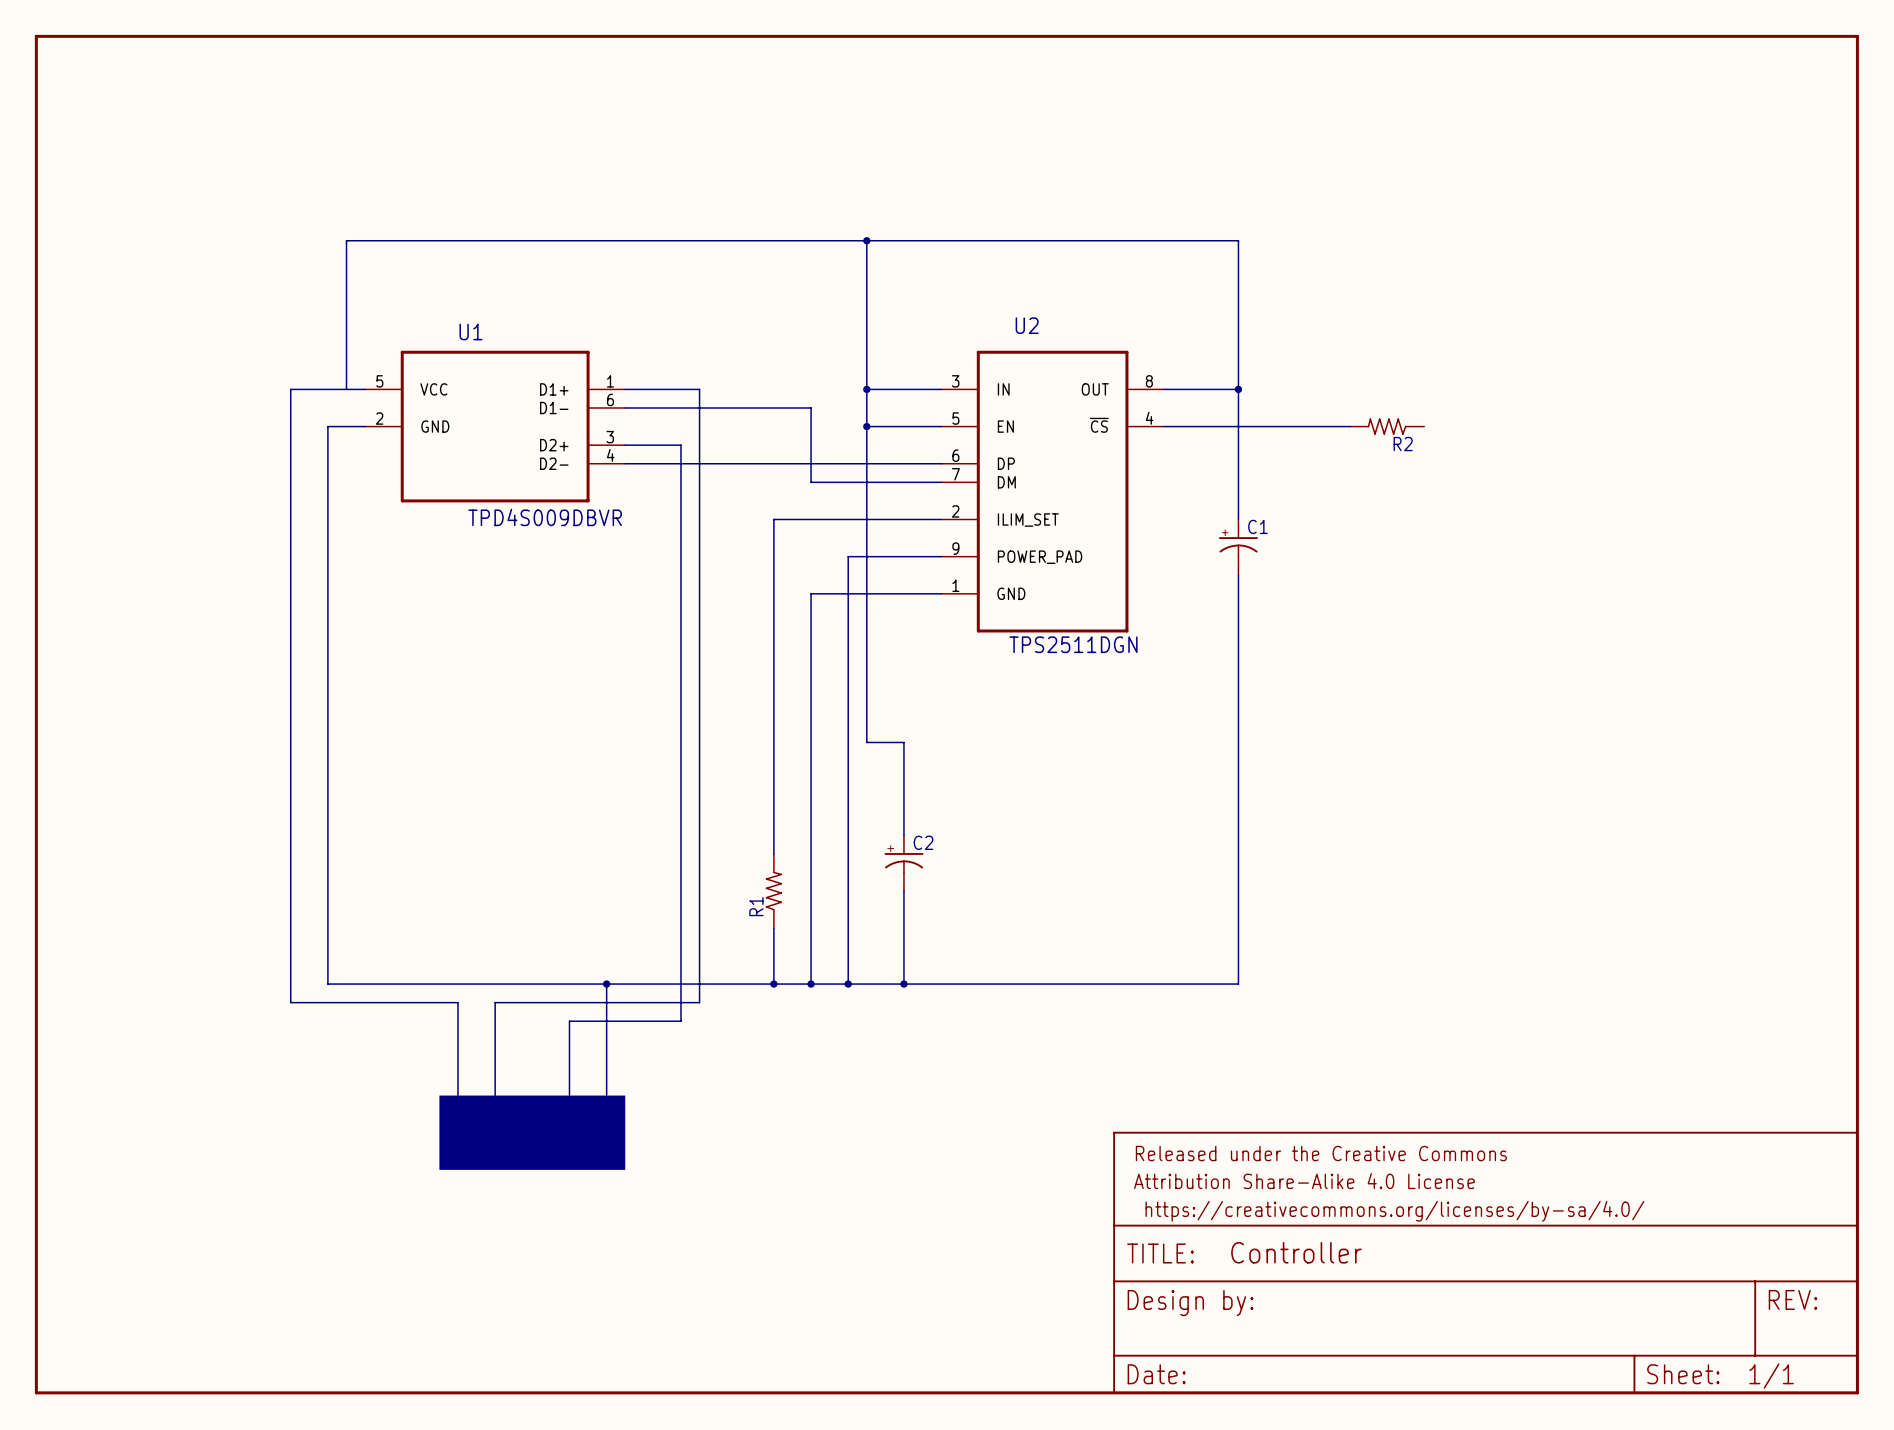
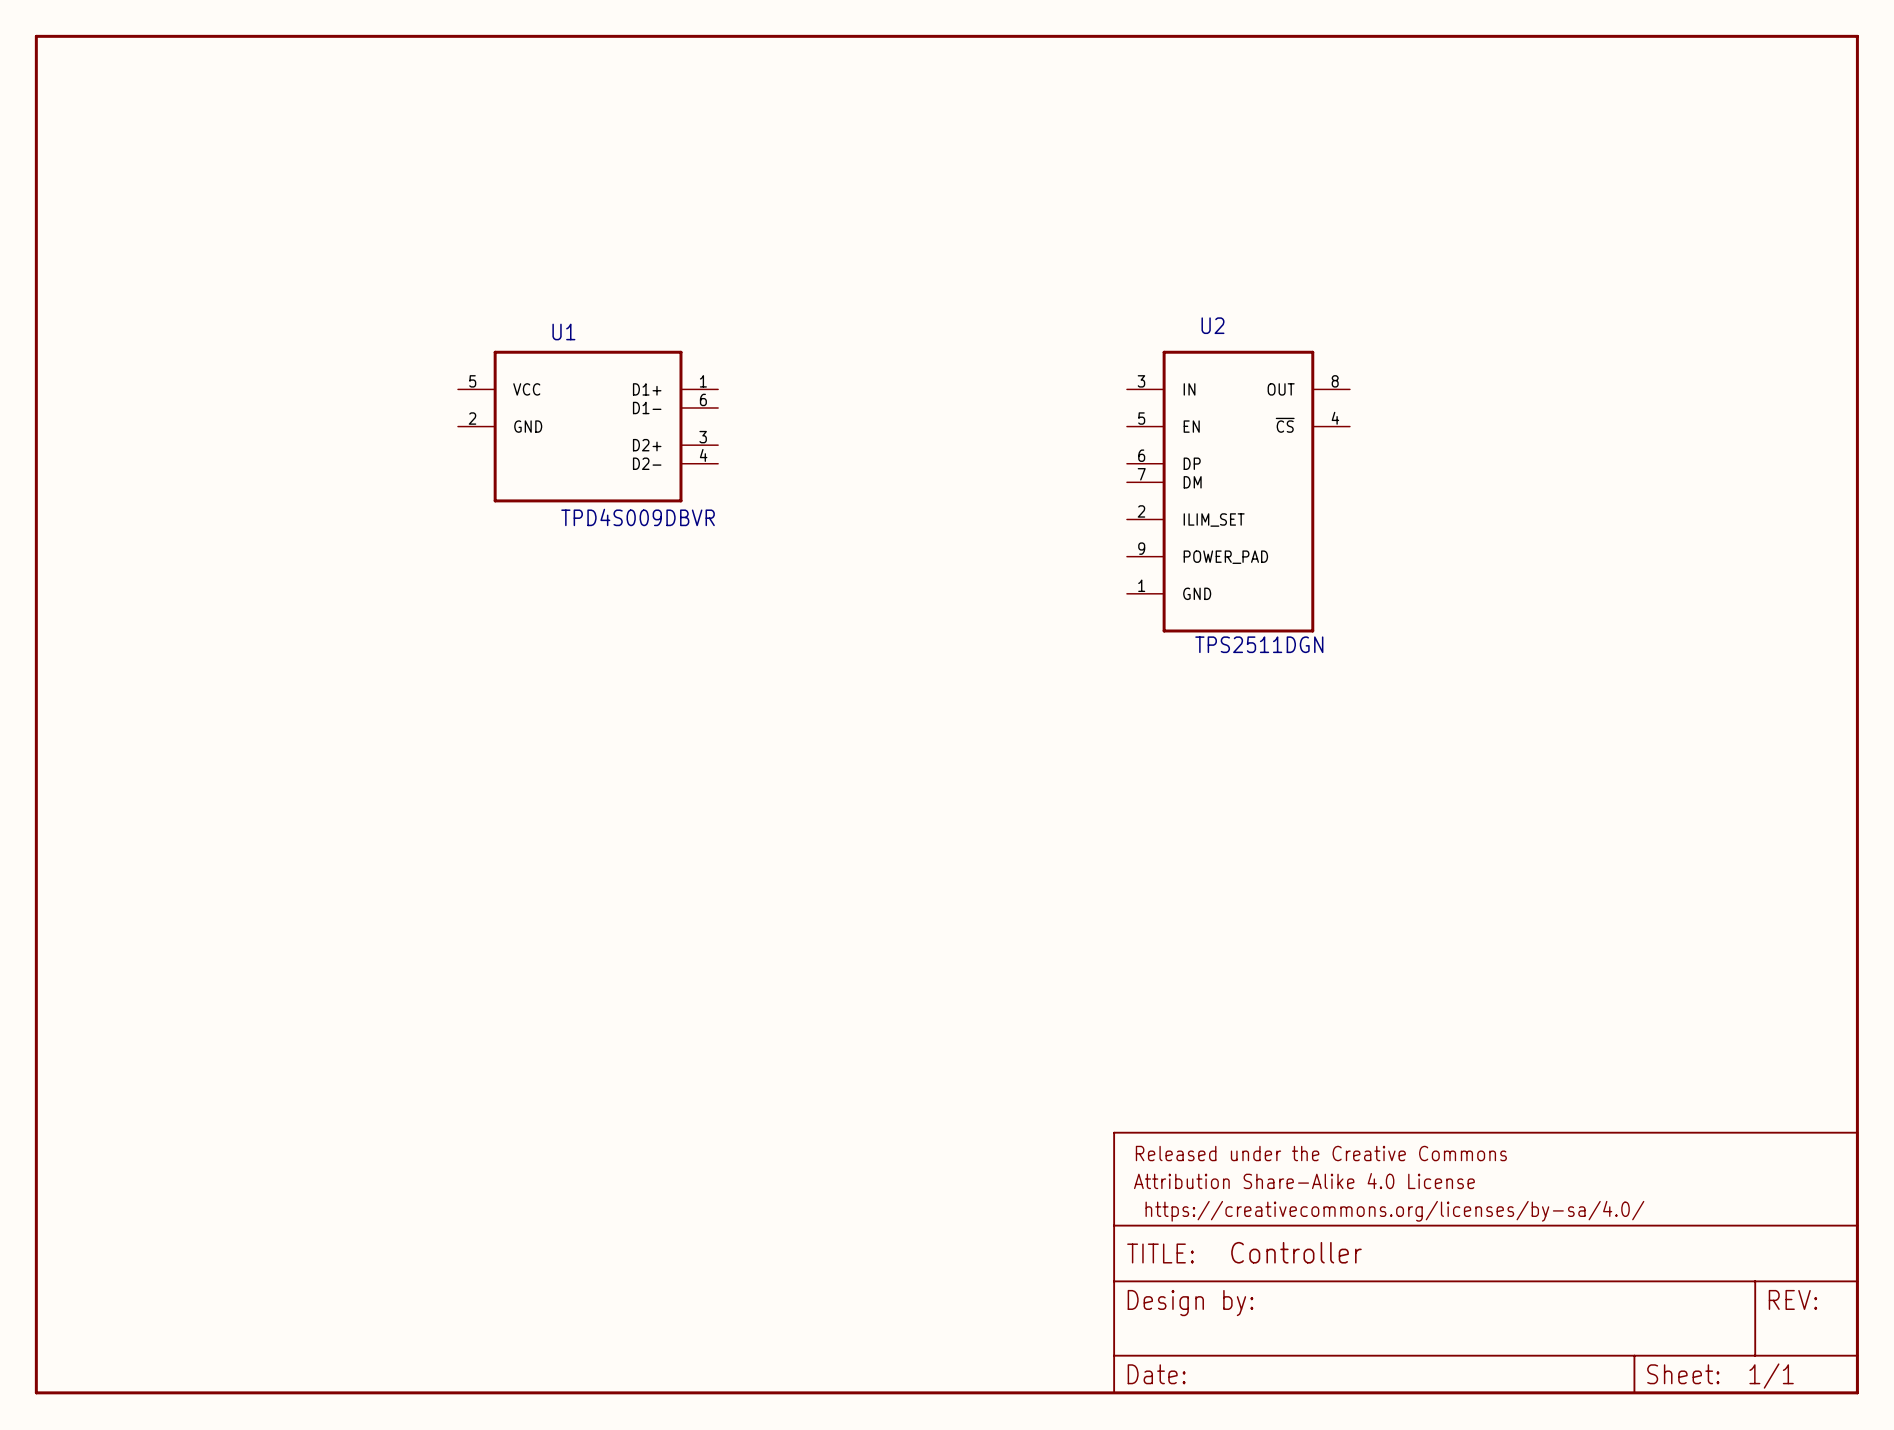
wire: (866, 240) (866, 742) (903, 742) (903, 835) -> none
junction: (866, 240) -> none
wire: (346, 389) (346, 240) (1238, 240) (1238, 519) -> none
wire: (365, 389) (290, 389) (290, 1002) (457, 1002) (457, 1095) -> none
wire: (625, 389) (699, 389) (699, 1002) (495, 1002) (495, 1095) -> none
wire: (866, 389) (941, 389) -> none
junction: (866, 389) -> none
wire: (1164, 389) (1238, 389) -> none
junction: (1238, 389) -> none
wire: (625, 407) (811, 407) (811, 482) (941, 482) -> none
wire: (365, 426) (327, 426) (327, 984) (1238, 984) (1238, 575) -> none
U1 position: (495, 426) -> (588, 426)
wire: (866, 426) (941, 426) -> none
junction: (866, 426) -> none
wire: (1164, 426) (1349, 426) -> none
R2: (1387, 426) -> none
wire: (625, 445) (680, 445) (680, 1021) (569, 1021) (569, 1095) -> none
wire: (625, 463) (941, 463) -> none
U2 position: (1052, 491) -> (1238, 491)
wire: (941, 519) (773, 519) (773, 853) -> none
C1: (1238, 547) -> none
wire: (941, 556) (848, 556) (848, 984) -> none
wire: (941, 593) (811, 593) (811, 984) -> none
C2: (903, 863) -> none
R1: (773, 891) -> none
wire: (903, 891) (903, 984) -> none
wire: (773, 928) (773, 984) -> none
wire: (606, 984) (606, 1095) -> none
junction: (606, 984) -> none
junction: (773, 984) -> none
junction: (811, 984) -> none
junction: (848, 984) -> none
junction: (903, 984) -> none
drawing: [439, 1095, 626, 1170] -> none

